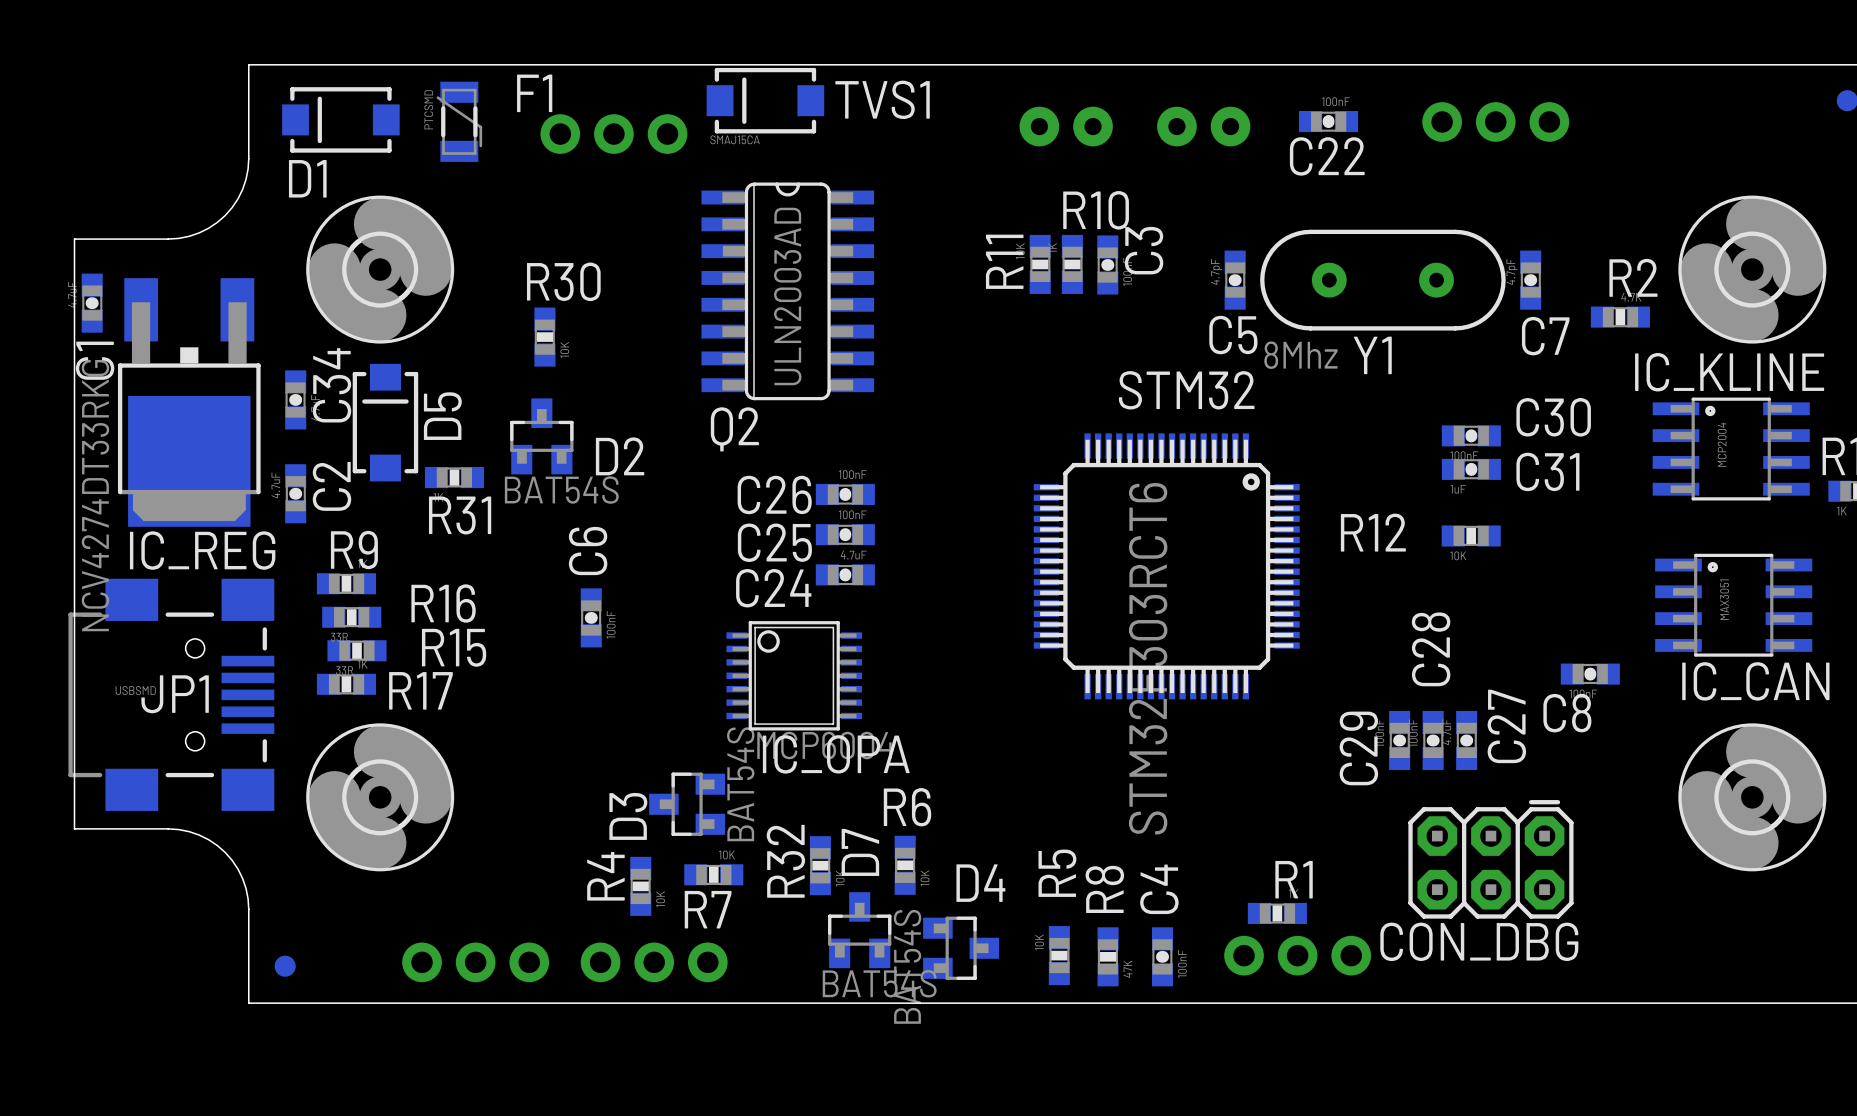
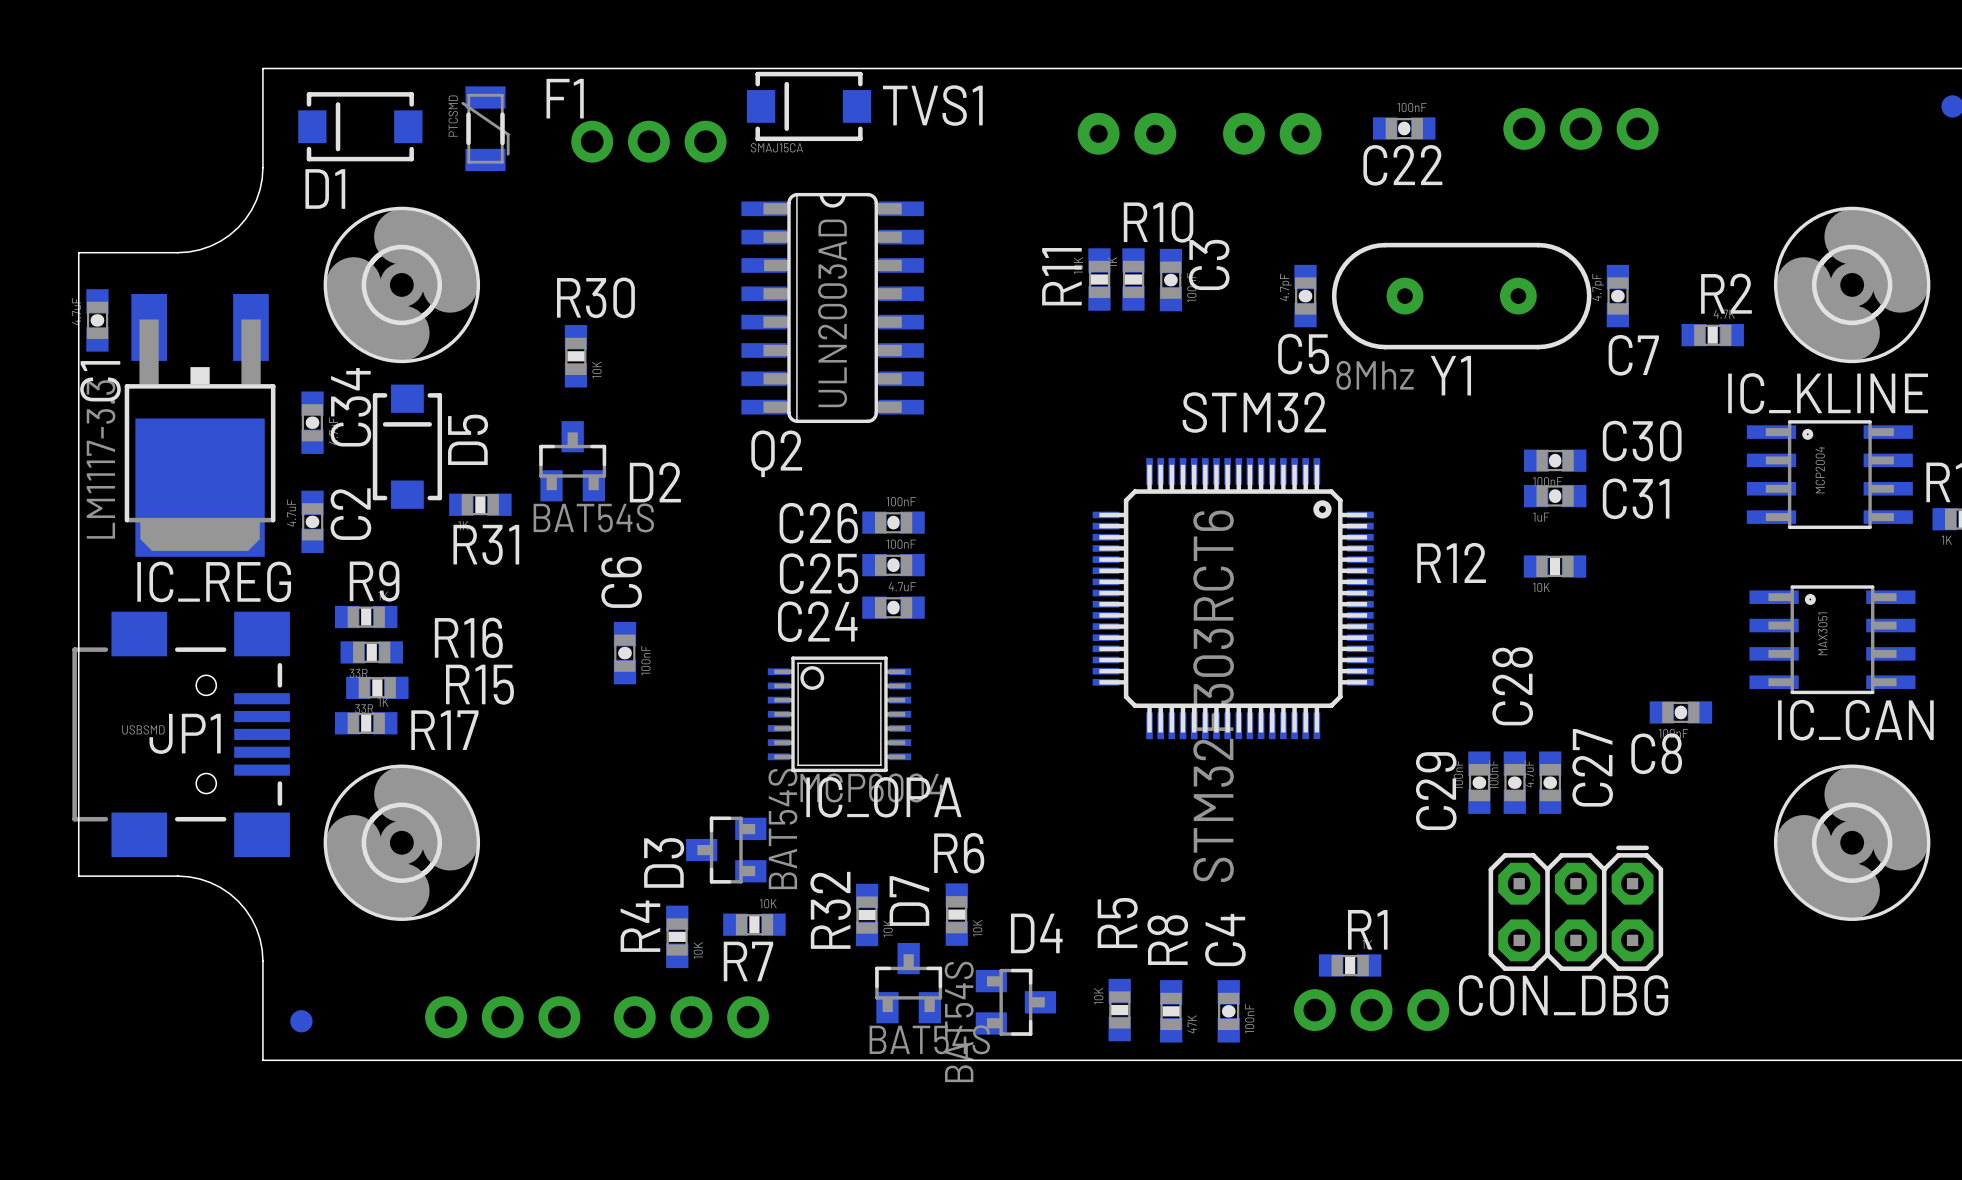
IC_REG value: NCV4274DT33RKG (95, 495) -> LM1117-3.3 (101, 459)

